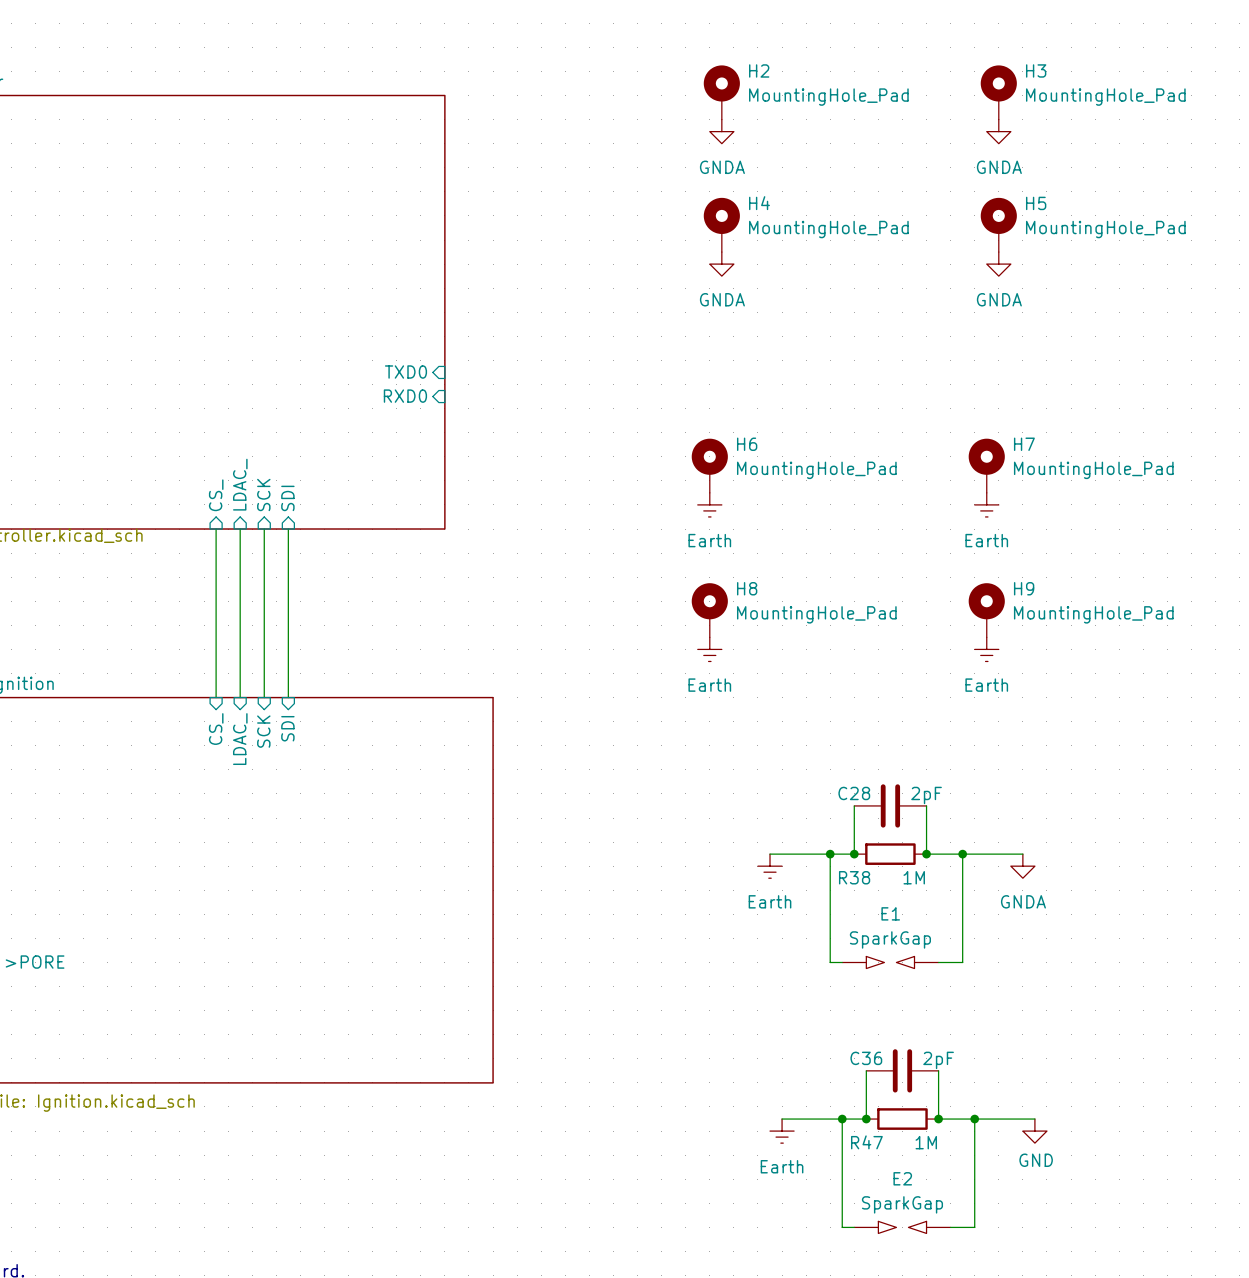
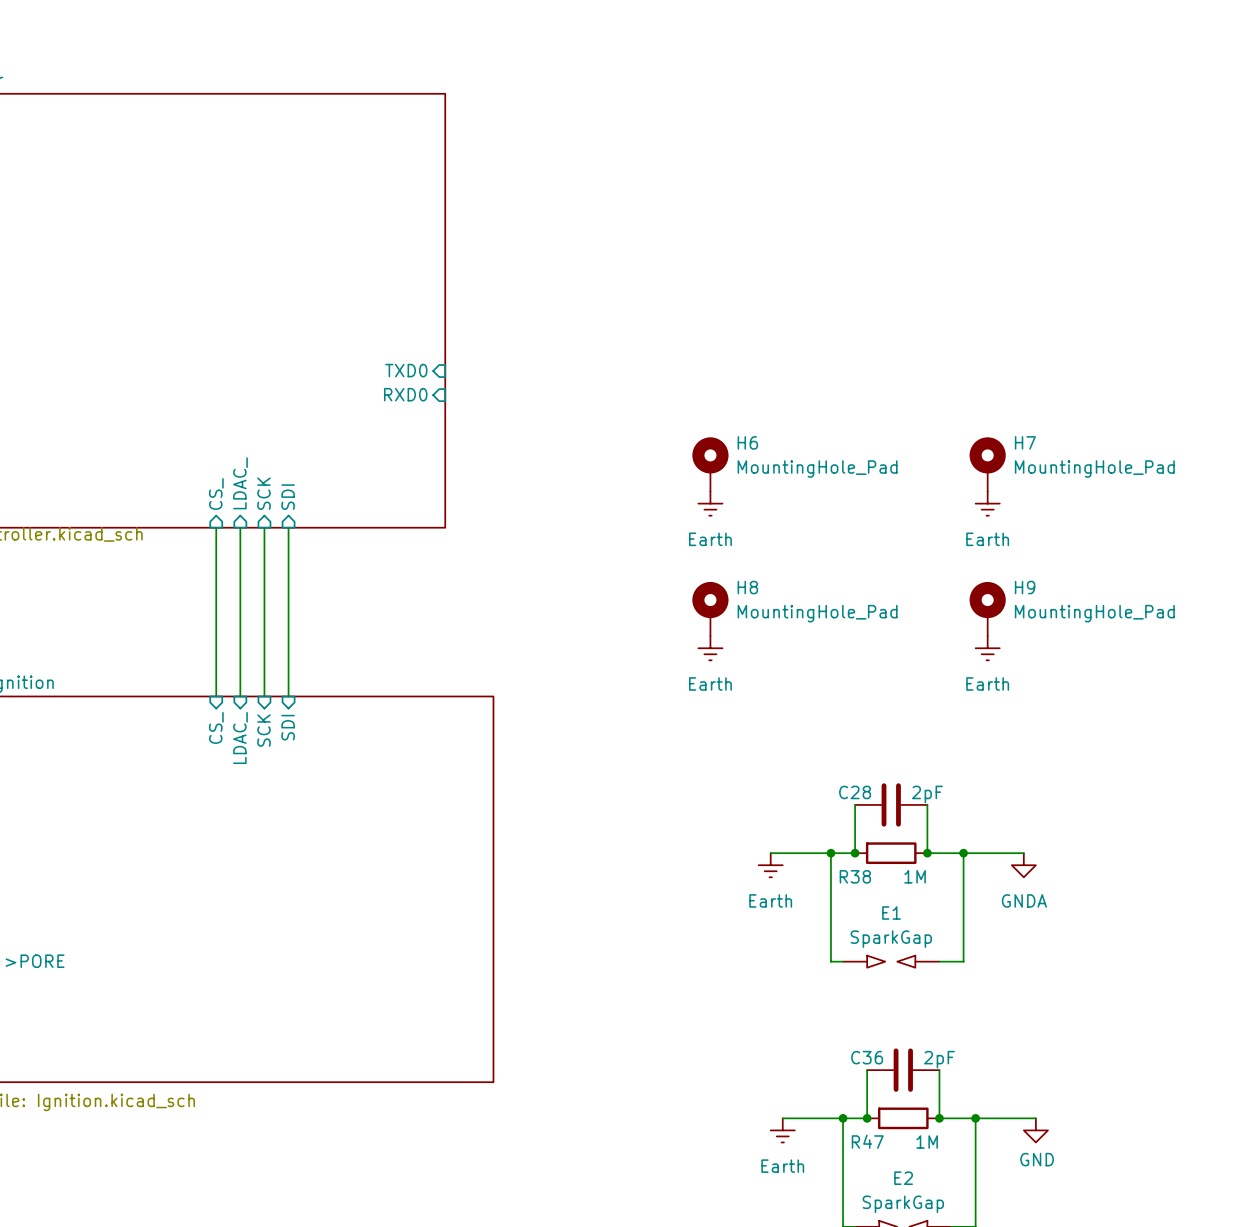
H2: MountingHole_Pad (721, 92) -> none
H3: MountingHole_Pad (998, 92) -> none
power symbol: GNDA (721, 131) -> none
power symbol: GNDA (998, 131) -> none
H4: MountingHole_Pad (721, 224) -> none
H5: MountingHole_Pad (998, 224) -> none
power symbol: GNDA (721, 264) -> none
power symbol: GNDA (998, 264) -> none

